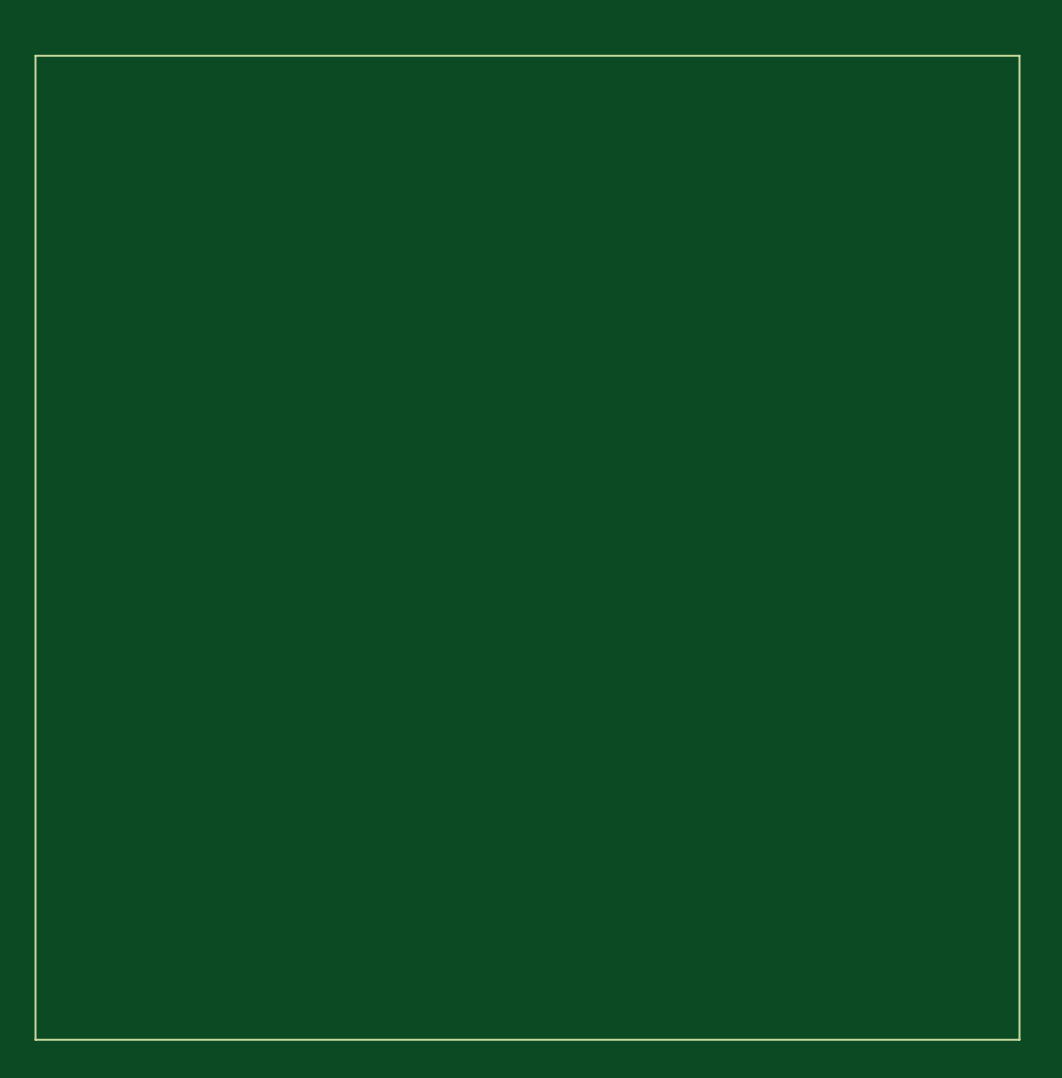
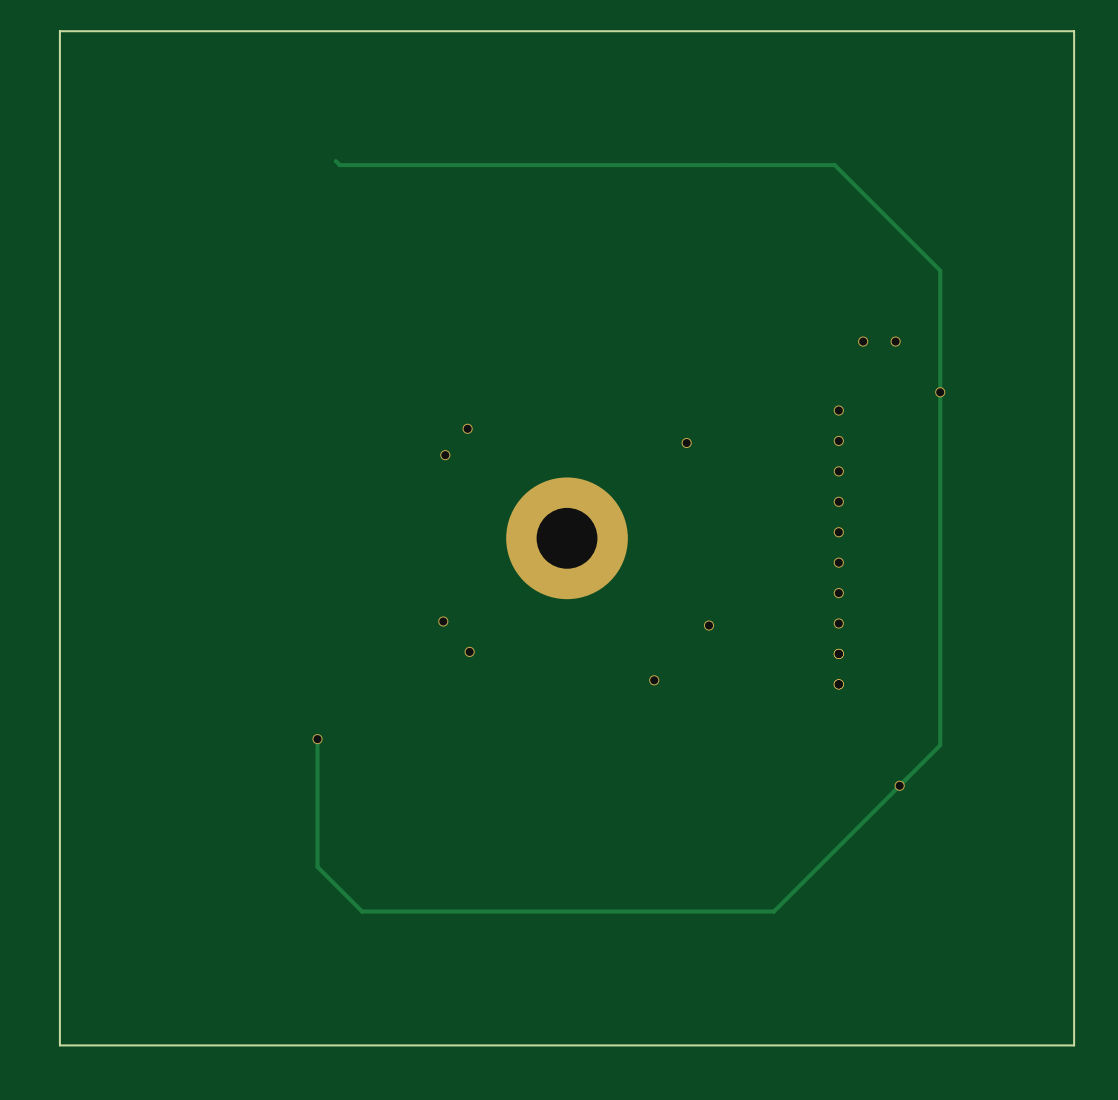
track: none -> (335, 161) (339, 165) (834, 165) (940, 270) (940, 745) (773, 911) (362, 911) (317, 866) (317, 739)
via: none -> (863, 341)
via: none -> (895, 341)
via: none -> (940, 392)
via: none -> (838, 410)
via: none -> (467, 428)
via: none -> (838, 440)
via: none -> (686, 442)
via: none -> (445, 455)
via: none -> (838, 471)
via: none -> (838, 501)
via: none -> (838, 532)
via: none -> (567, 538)
via: none -> (838, 562)
via: none -> (838, 593)
via: none -> (443, 621)
via: none -> (838, 623)
via: none -> (709, 625)
via: none -> (469, 651)
via: none -> (838, 653)
via: none -> (654, 680)
via: none -> (838, 684)
via: none -> (317, 739)
via: none -> (899, 785)

